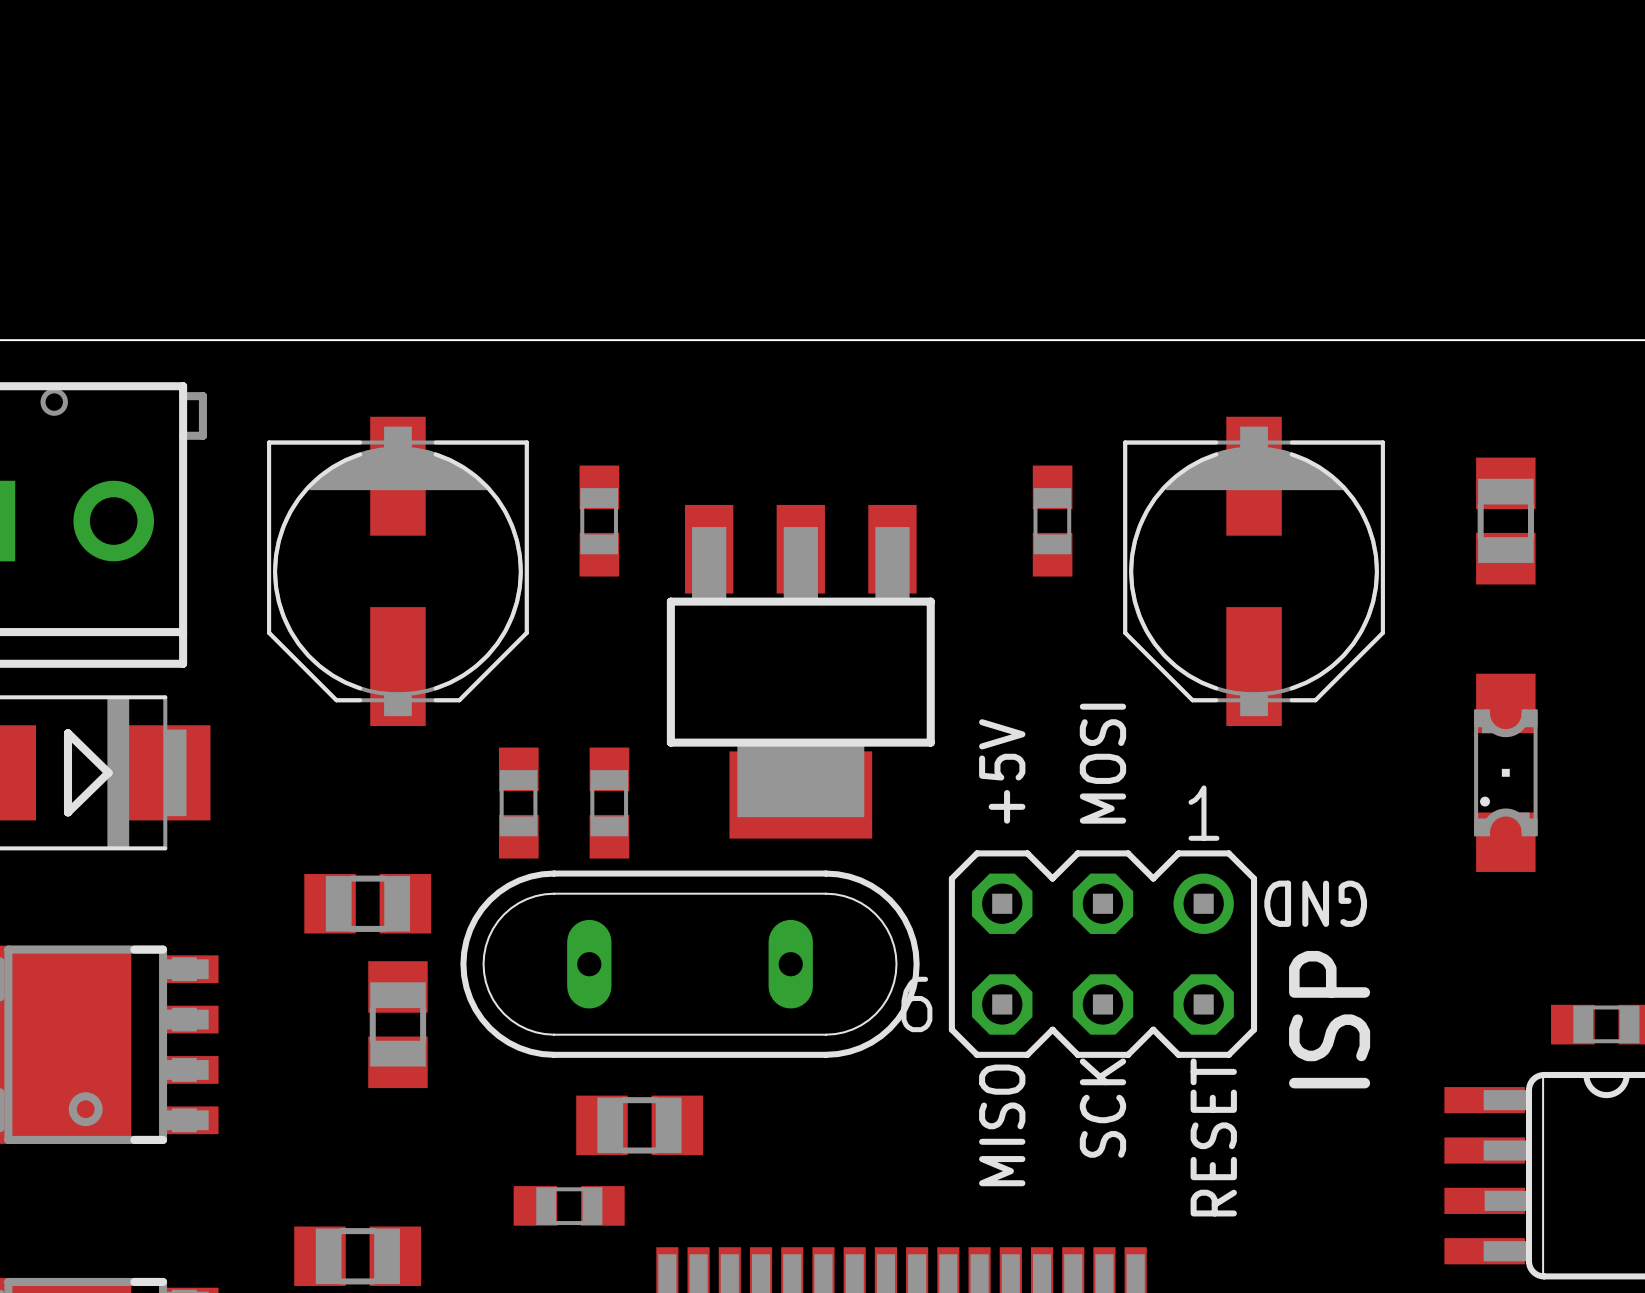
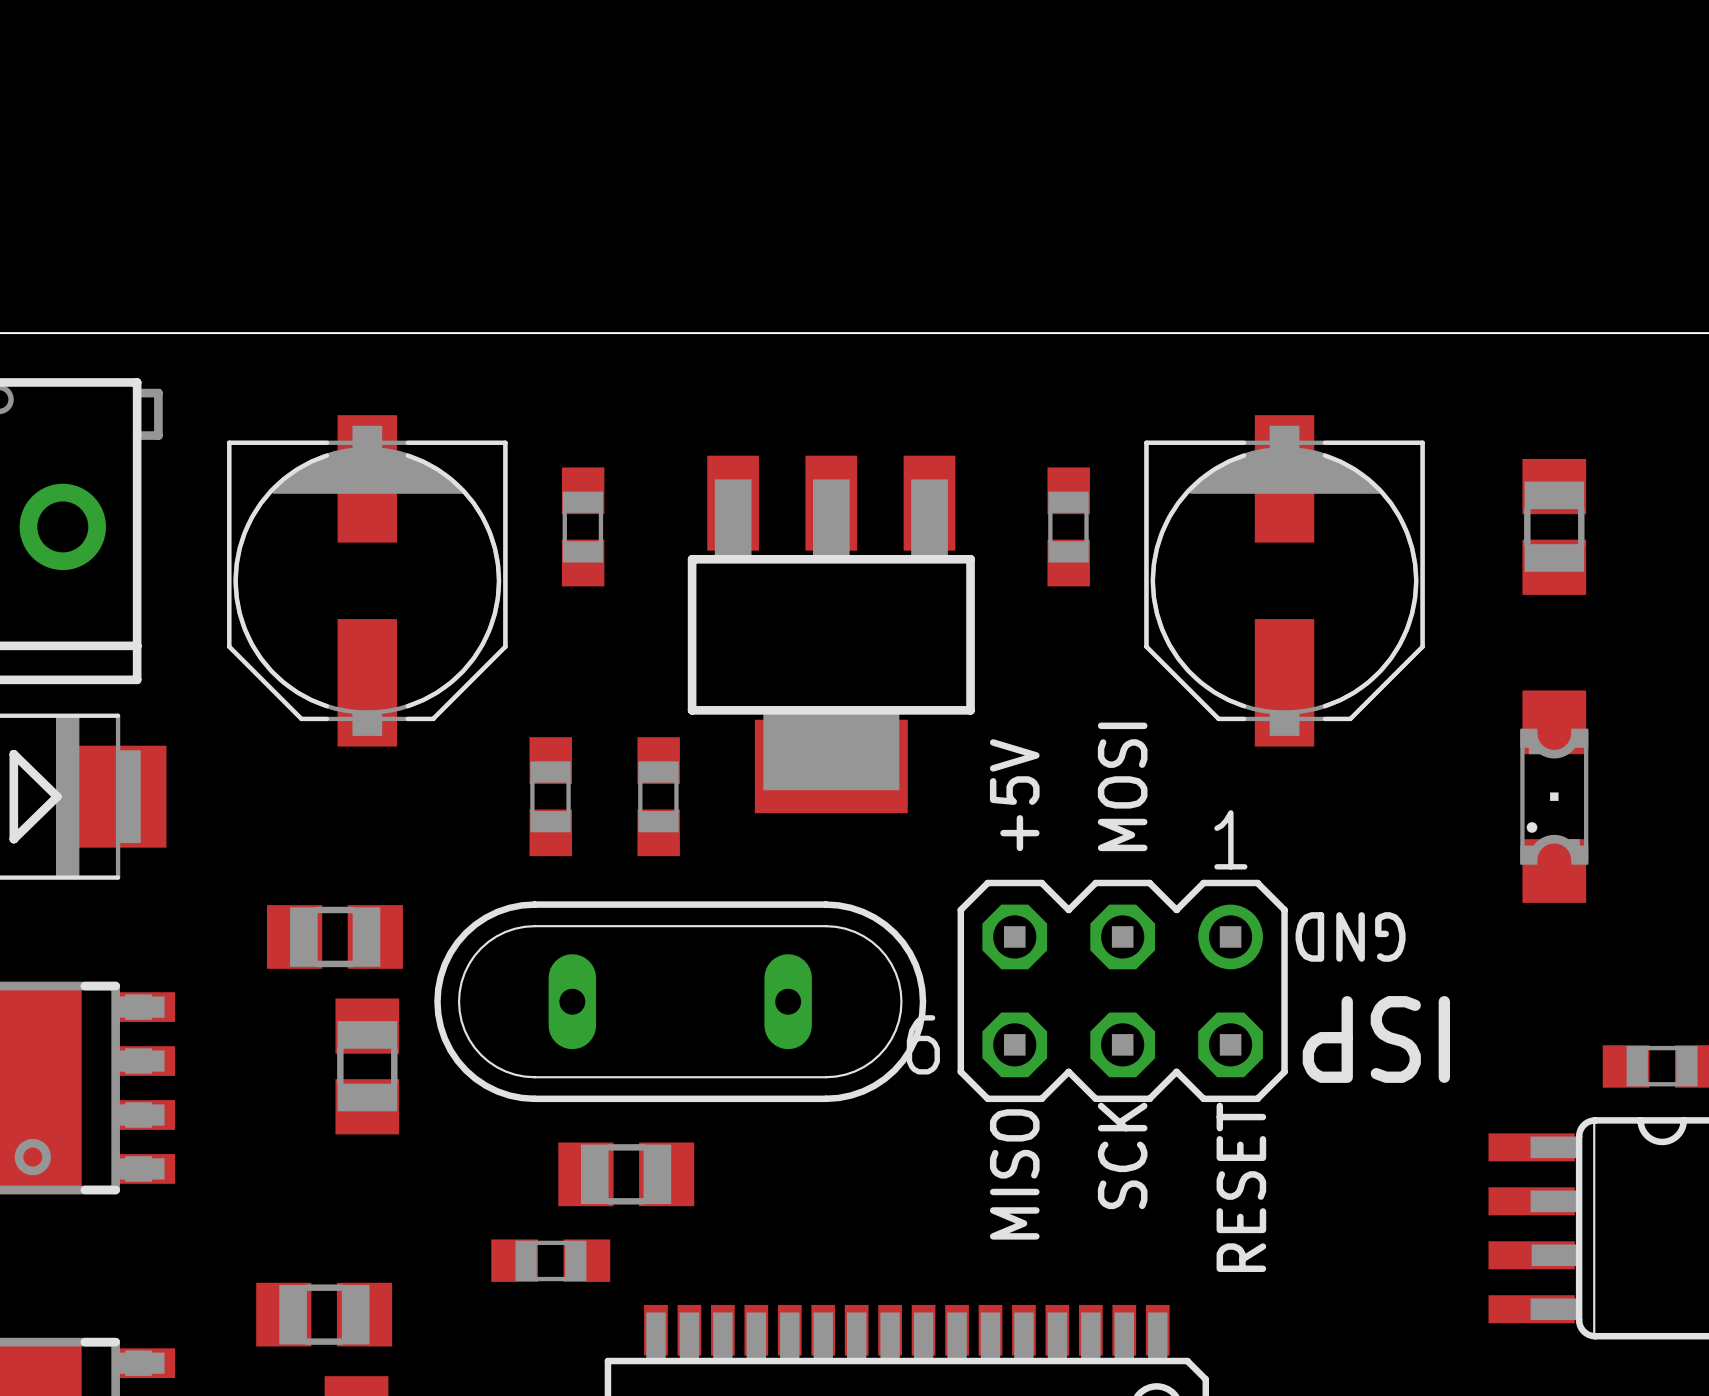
part position: (800, 671) -> (831, 634)
part: none -> (550, 796)
part: none -> (658, 796)
part: (518, 803) -> none
part: (609, 803) -> none
text rotation: 0° (1329, 1019) -> 90° counterclockwise (1376, 1039)

